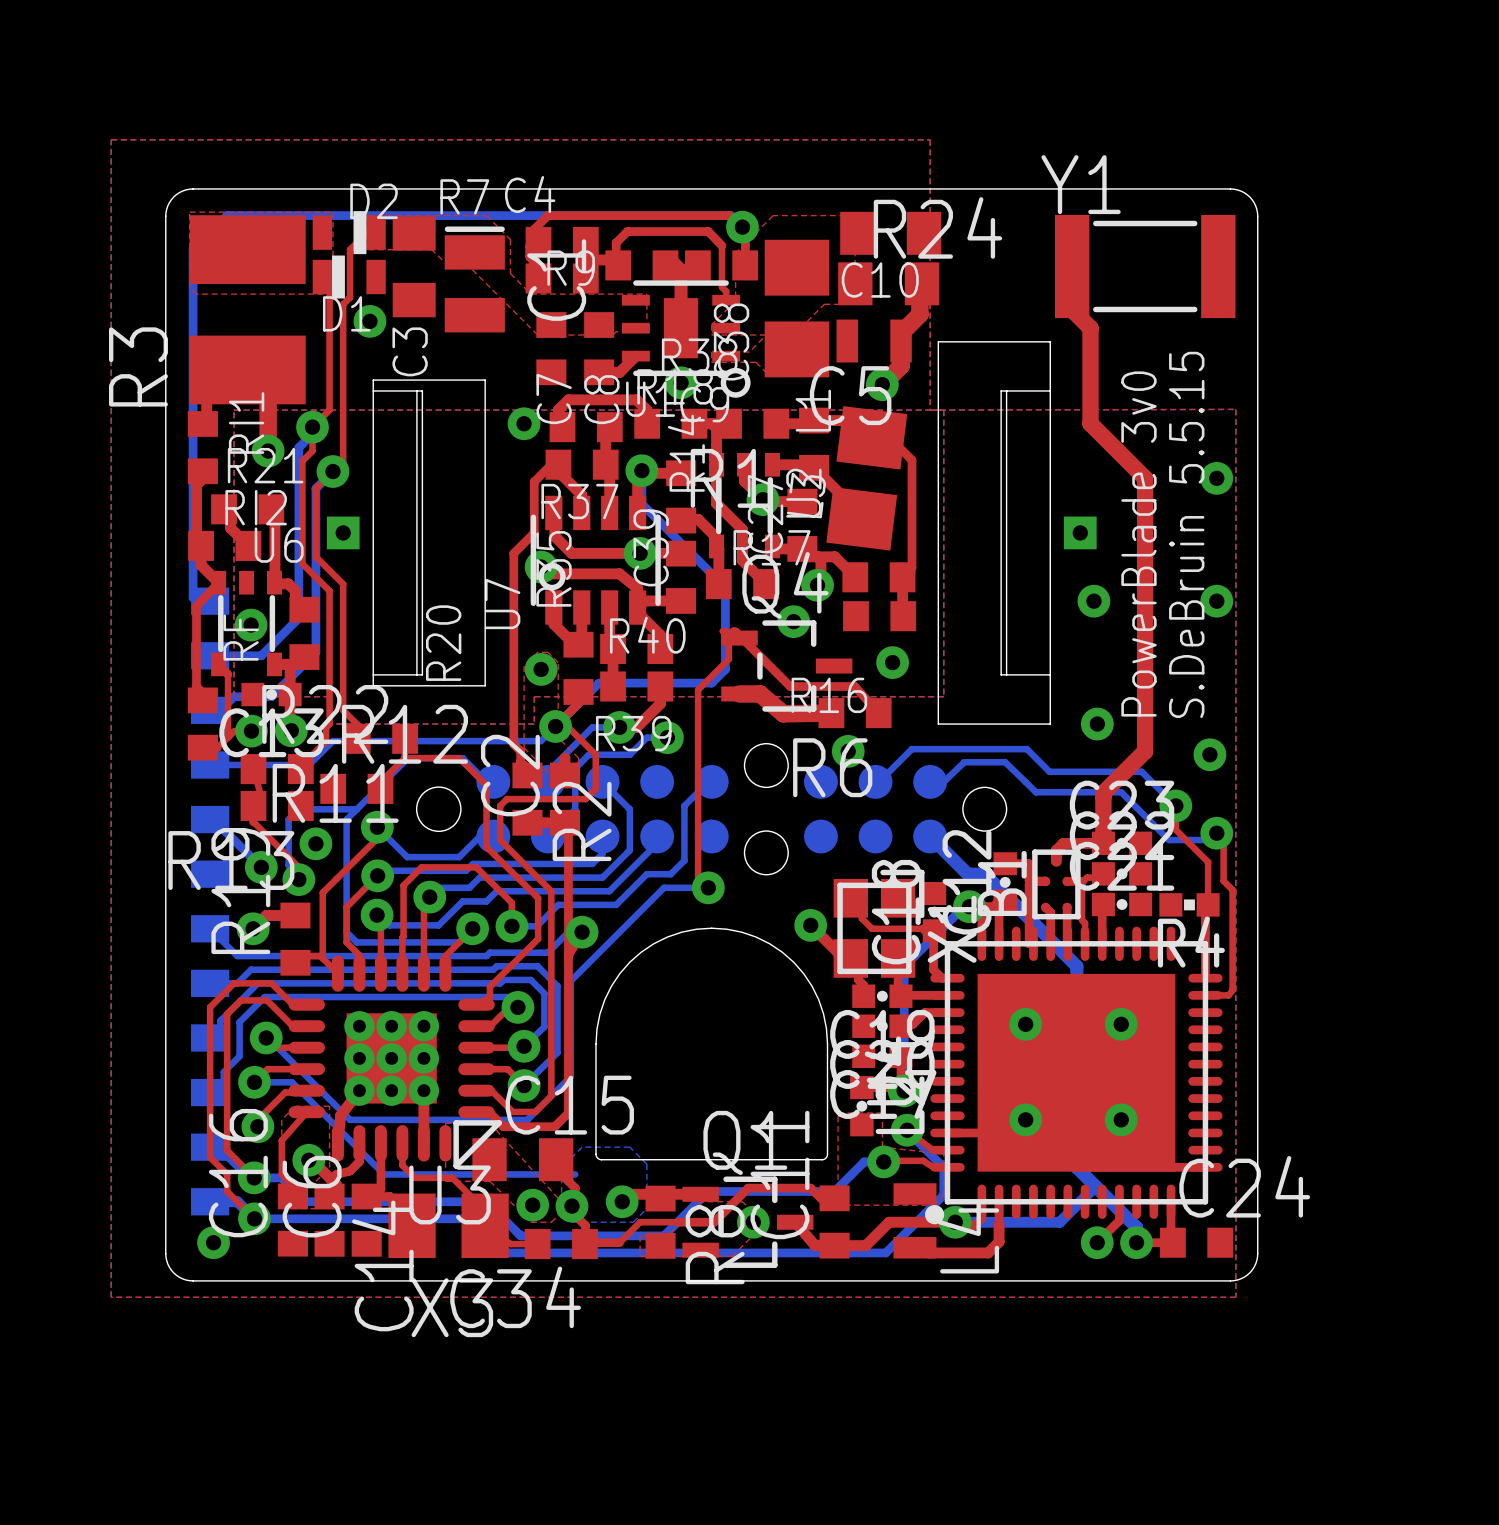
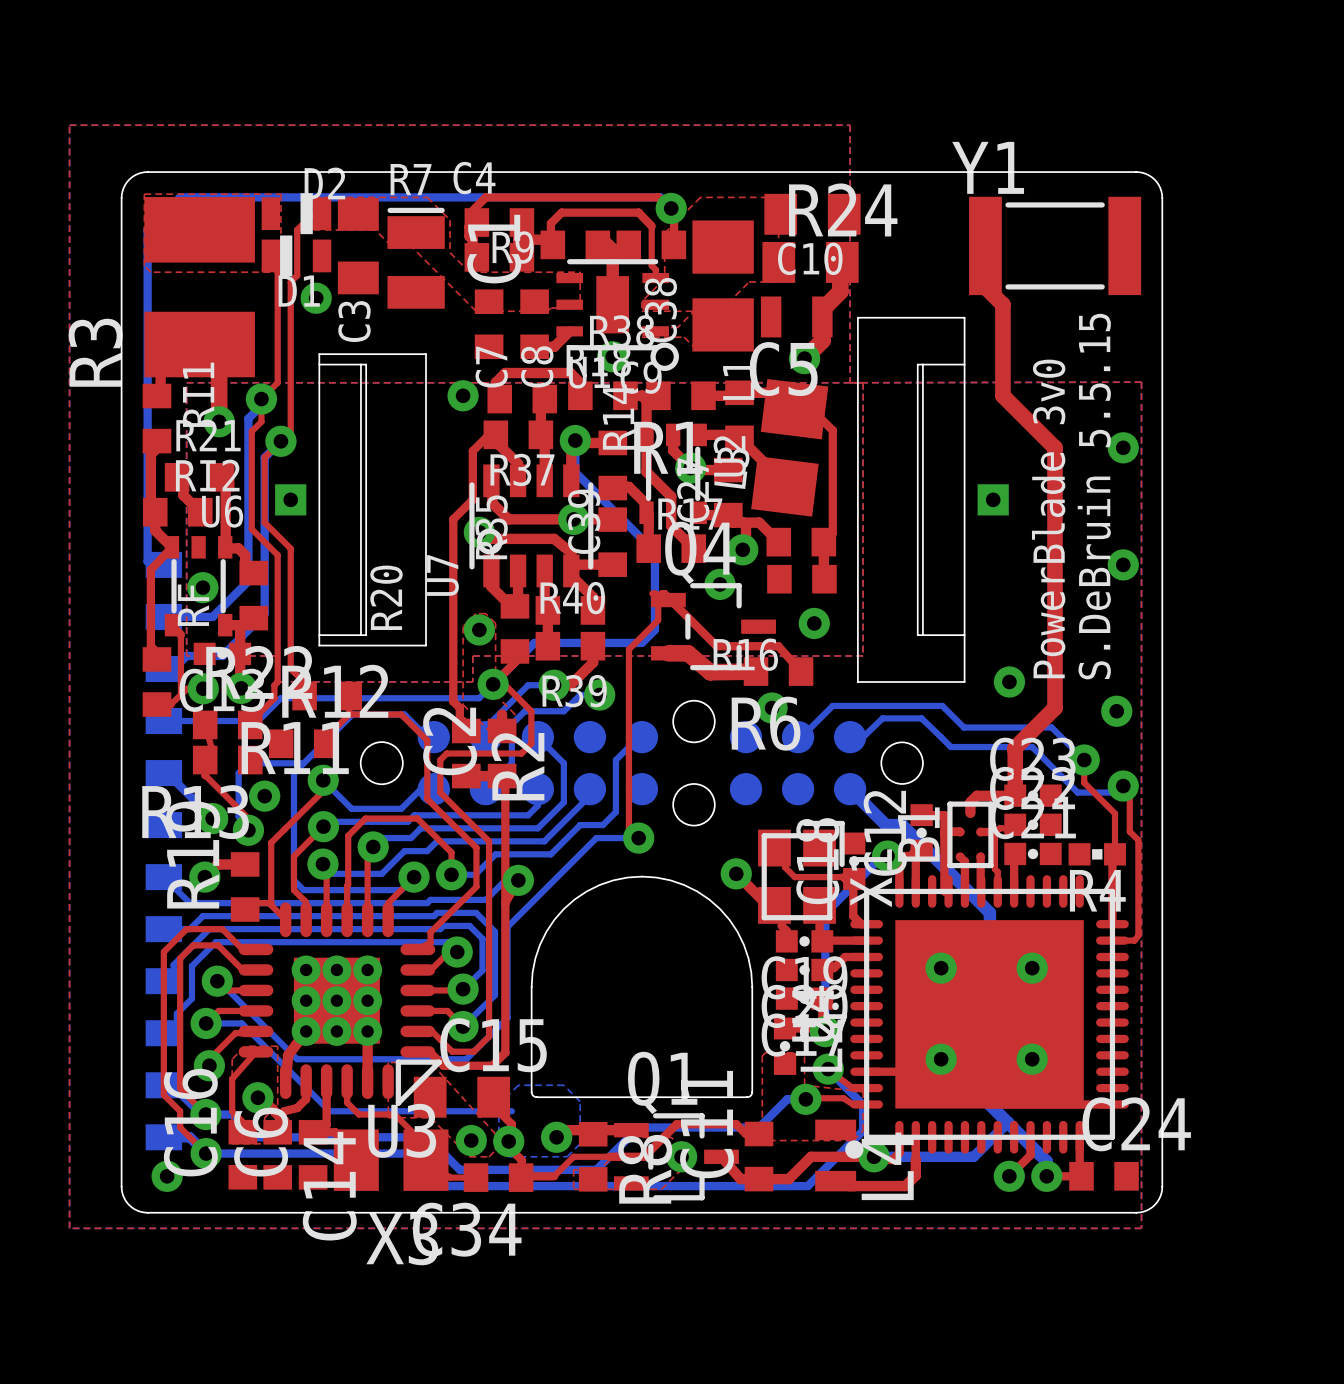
via: (1093, 601) -> none

